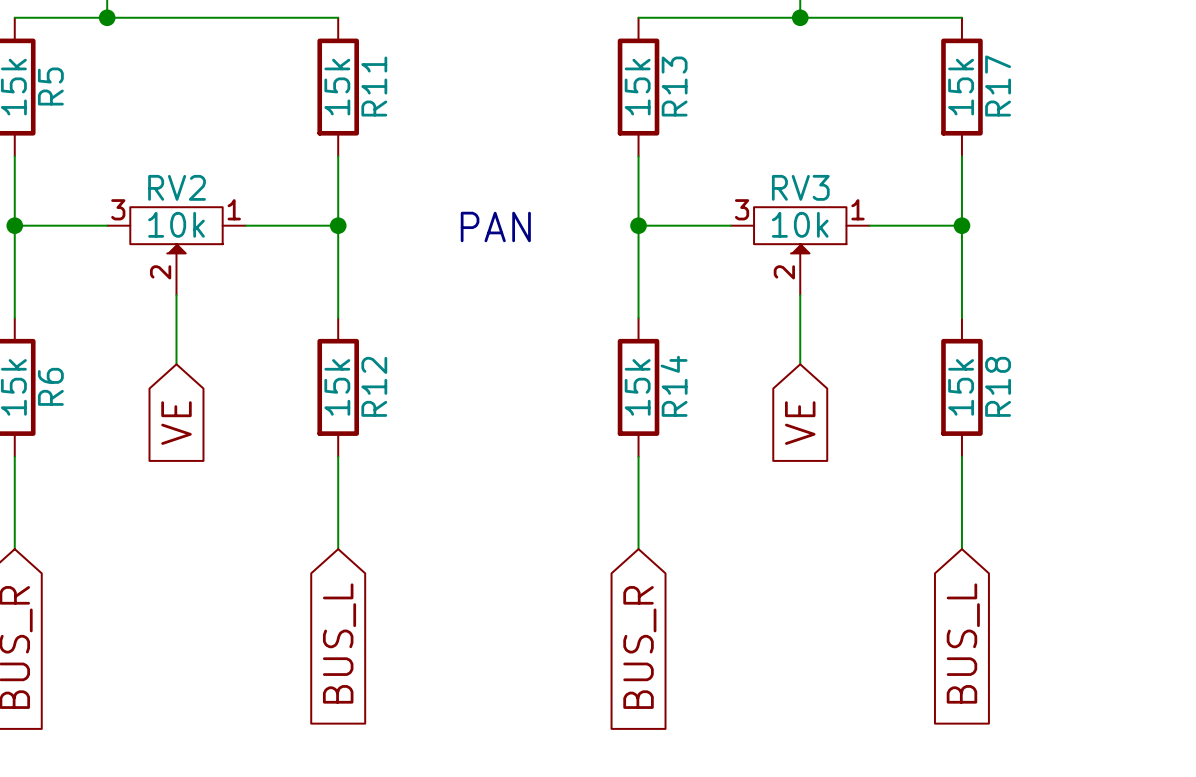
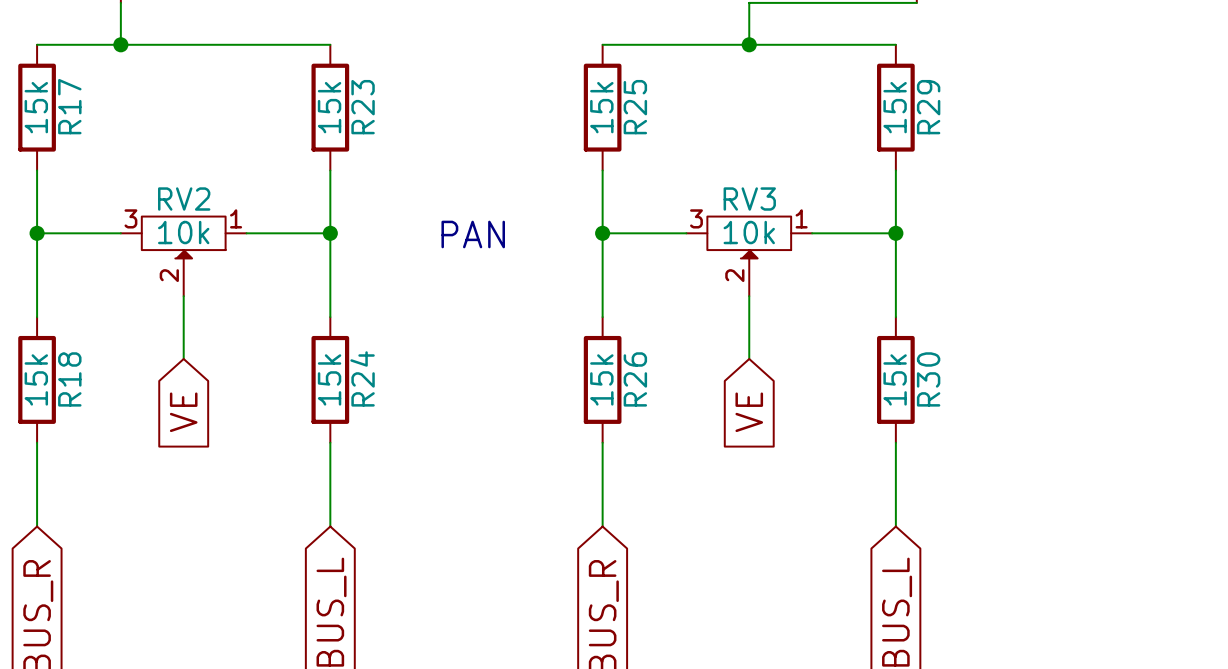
R17 name: R17 (998, 85) -> R29 (928, 107)
R5 name: R5 (50, 86) -> R17 (69, 106)
R11 name: R11 (374, 86) -> R23 (363, 107)
R13 name: R13 (674, 86) -> R25 (635, 107)
R6 name: R6 (50, 386) -> R18 (69, 379)
R12 name: R12 (374, 386) -> R24 (362, 378)
R14 name: R14 (674, 386) -> R26 (635, 379)
R18 name: R18 (998, 386) -> R30 (928, 379)

